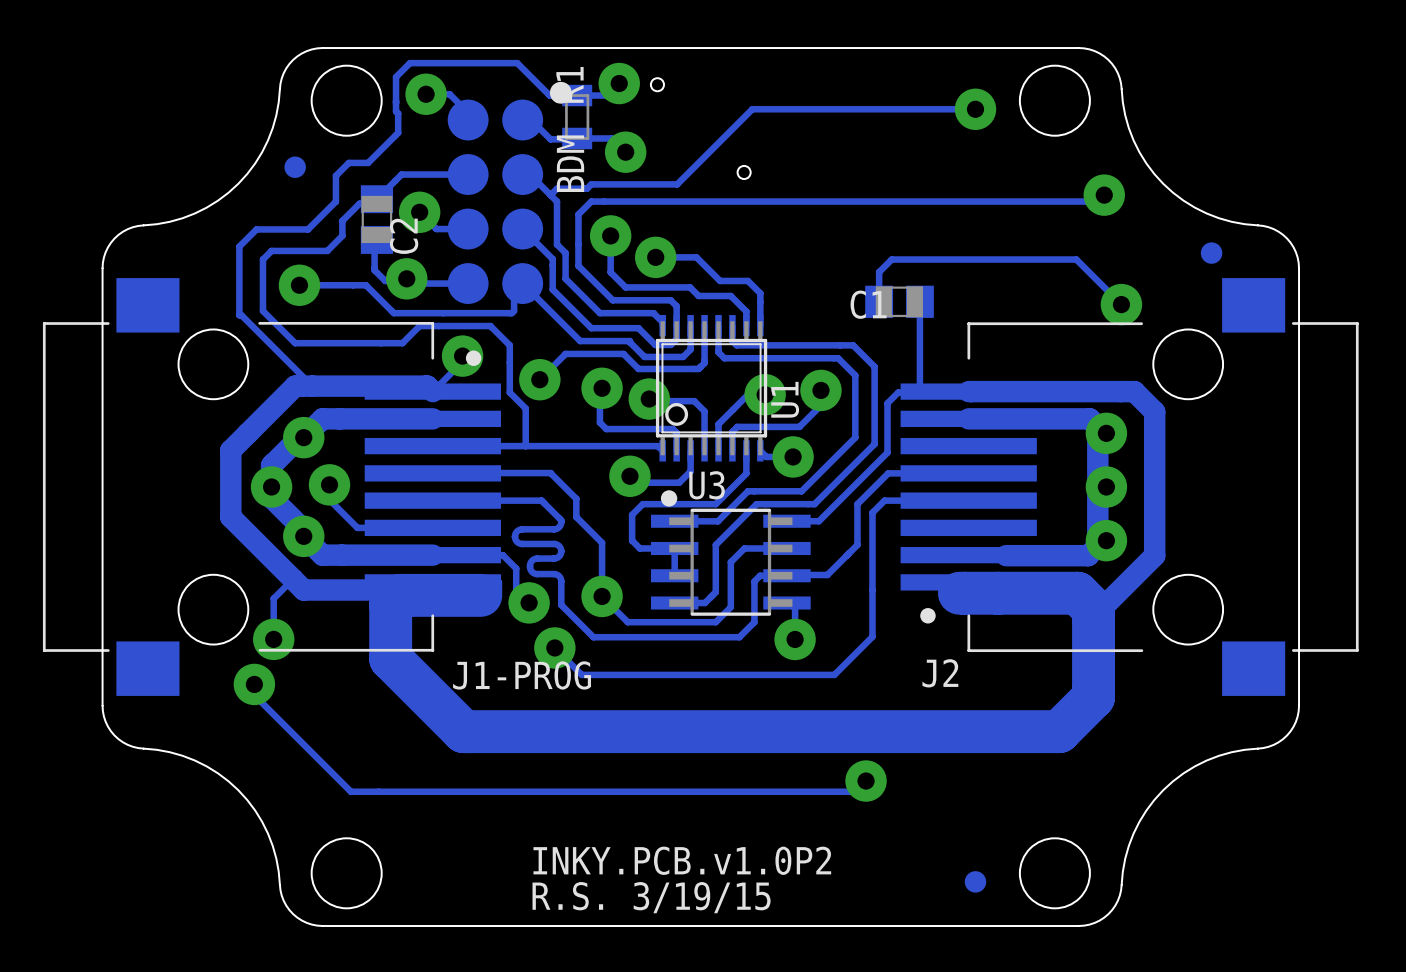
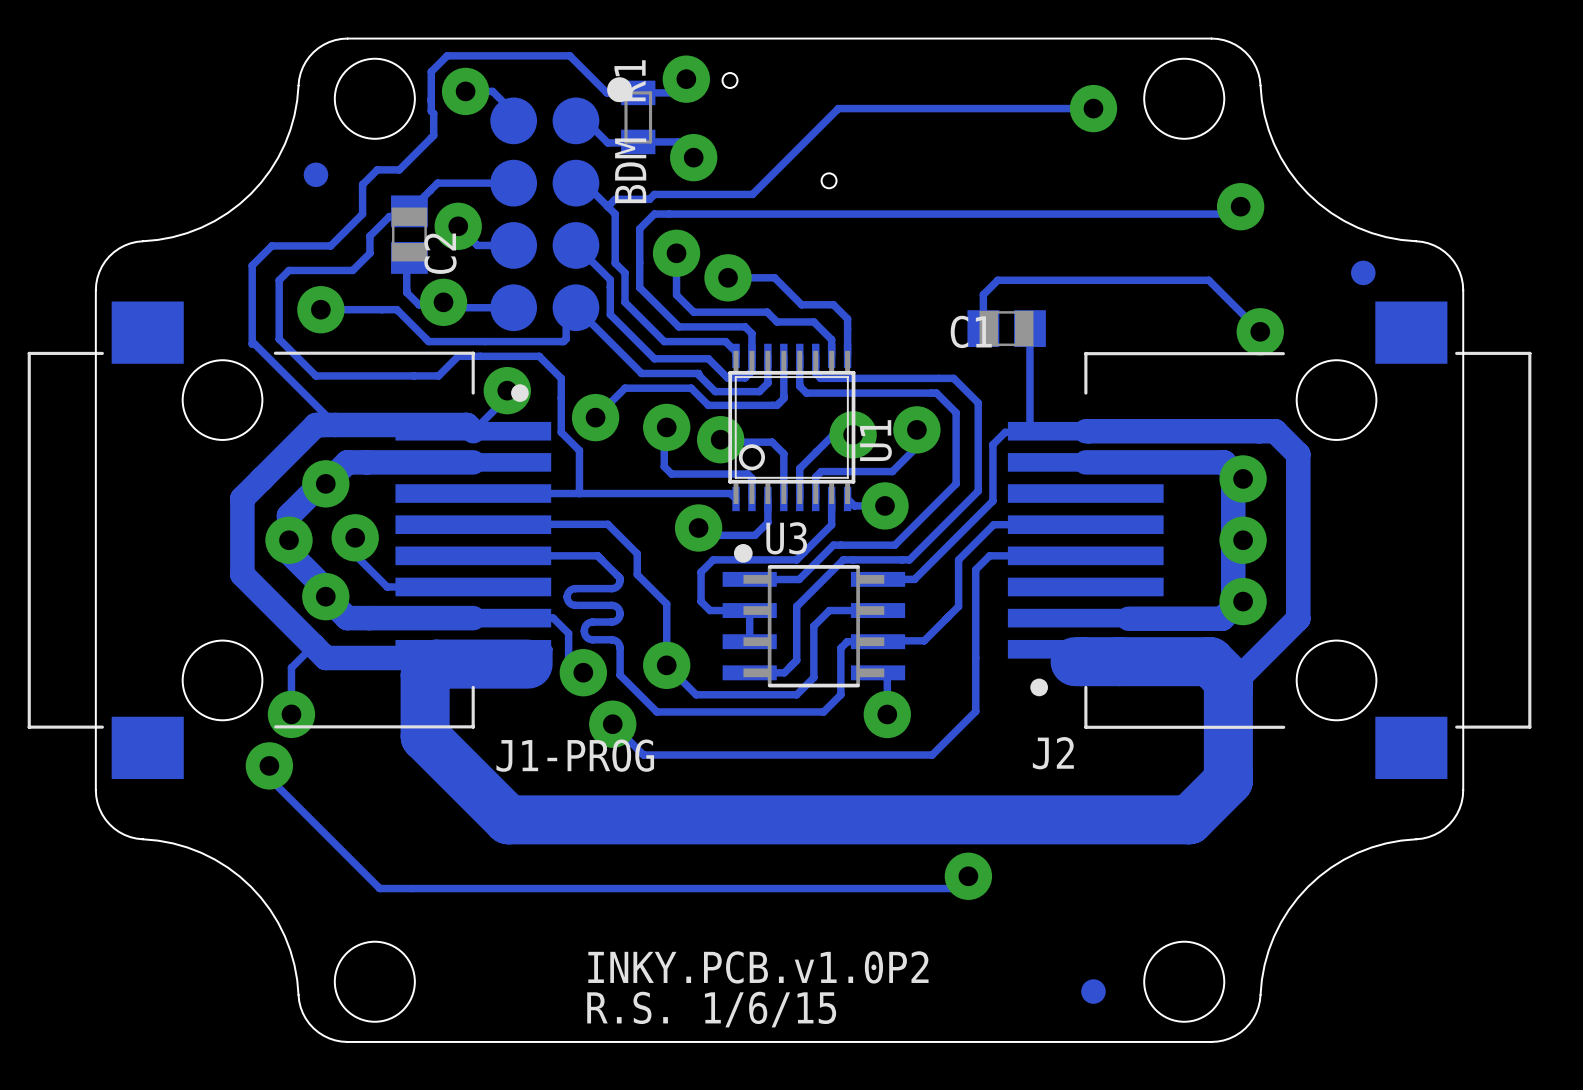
text: R.S. 3/19/15 (651, 897) -> R.S. 1/6/15 (711, 1009)

